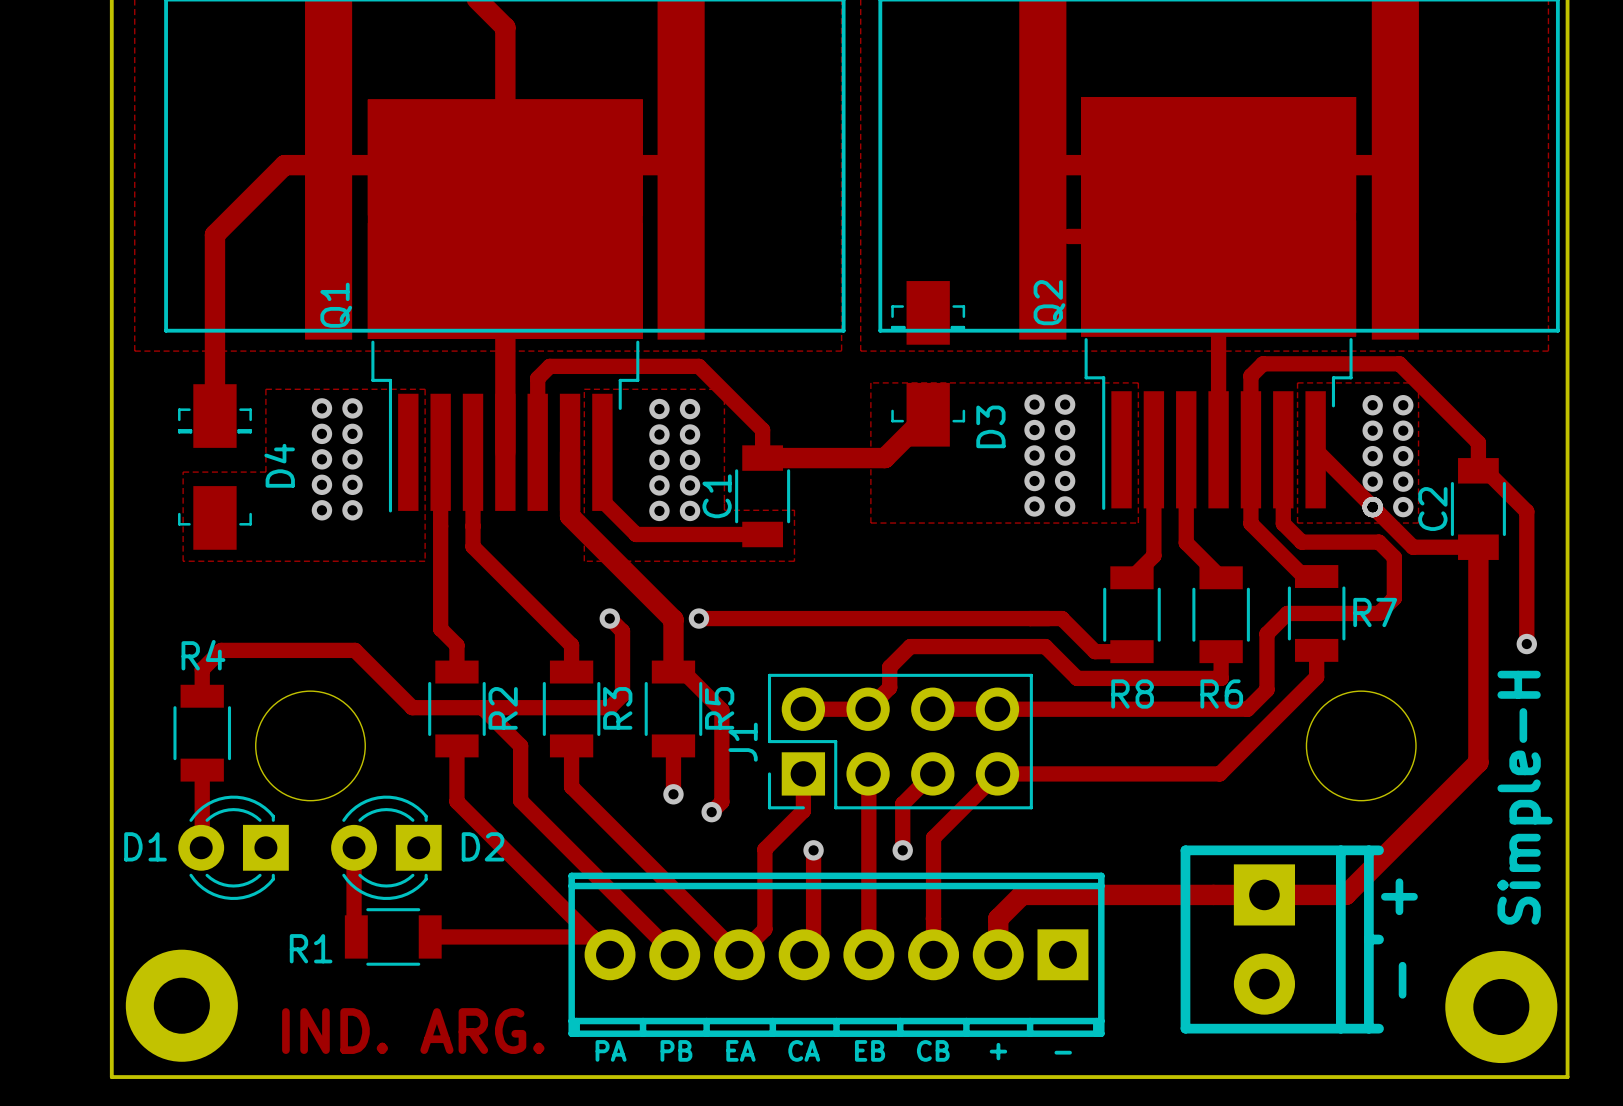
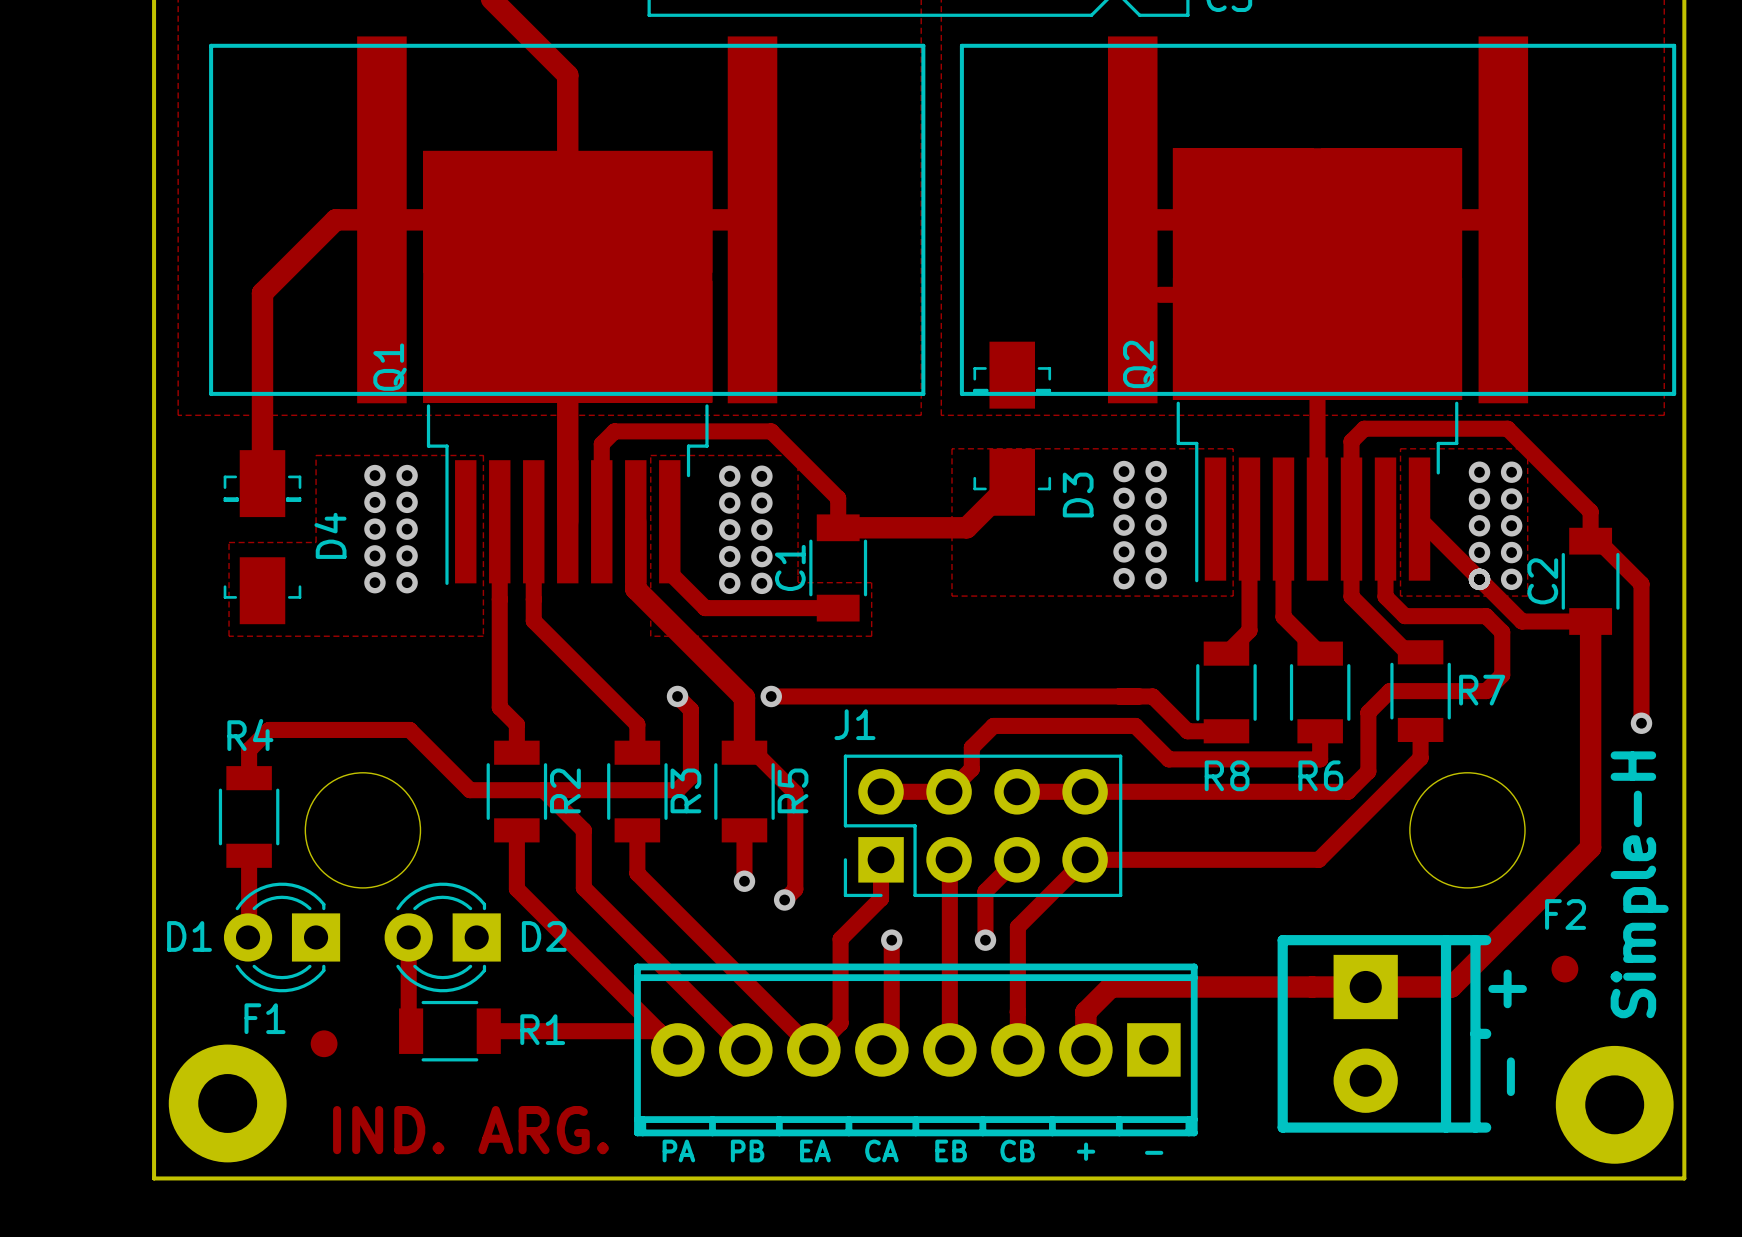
J1 name rotation: 0° (743, 742) -> 90° clockwise (854, 724)
J1 name position: J1 (743, 742) -> J1 (854, 724)
F2: none -> (1564, 969)
F1: none -> (324, 1043)
R1 name position: R1 (311, 948) -> R1 (542, 1029)

